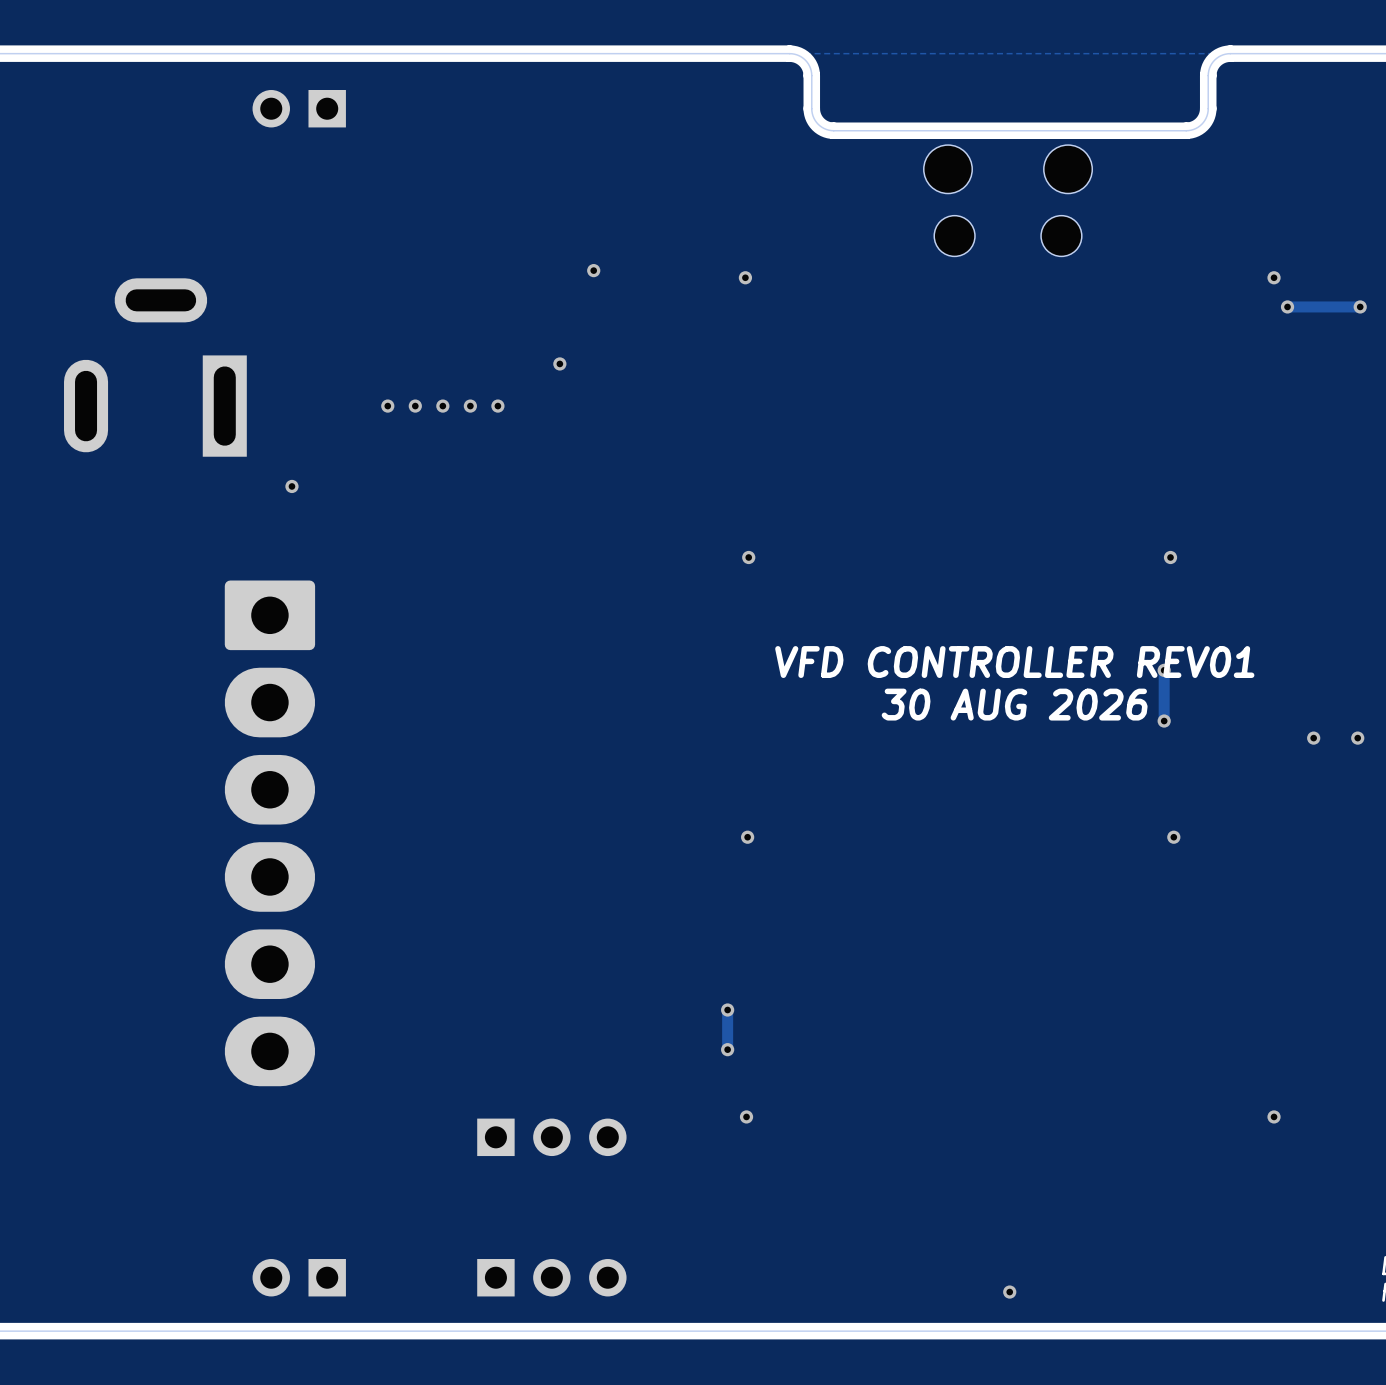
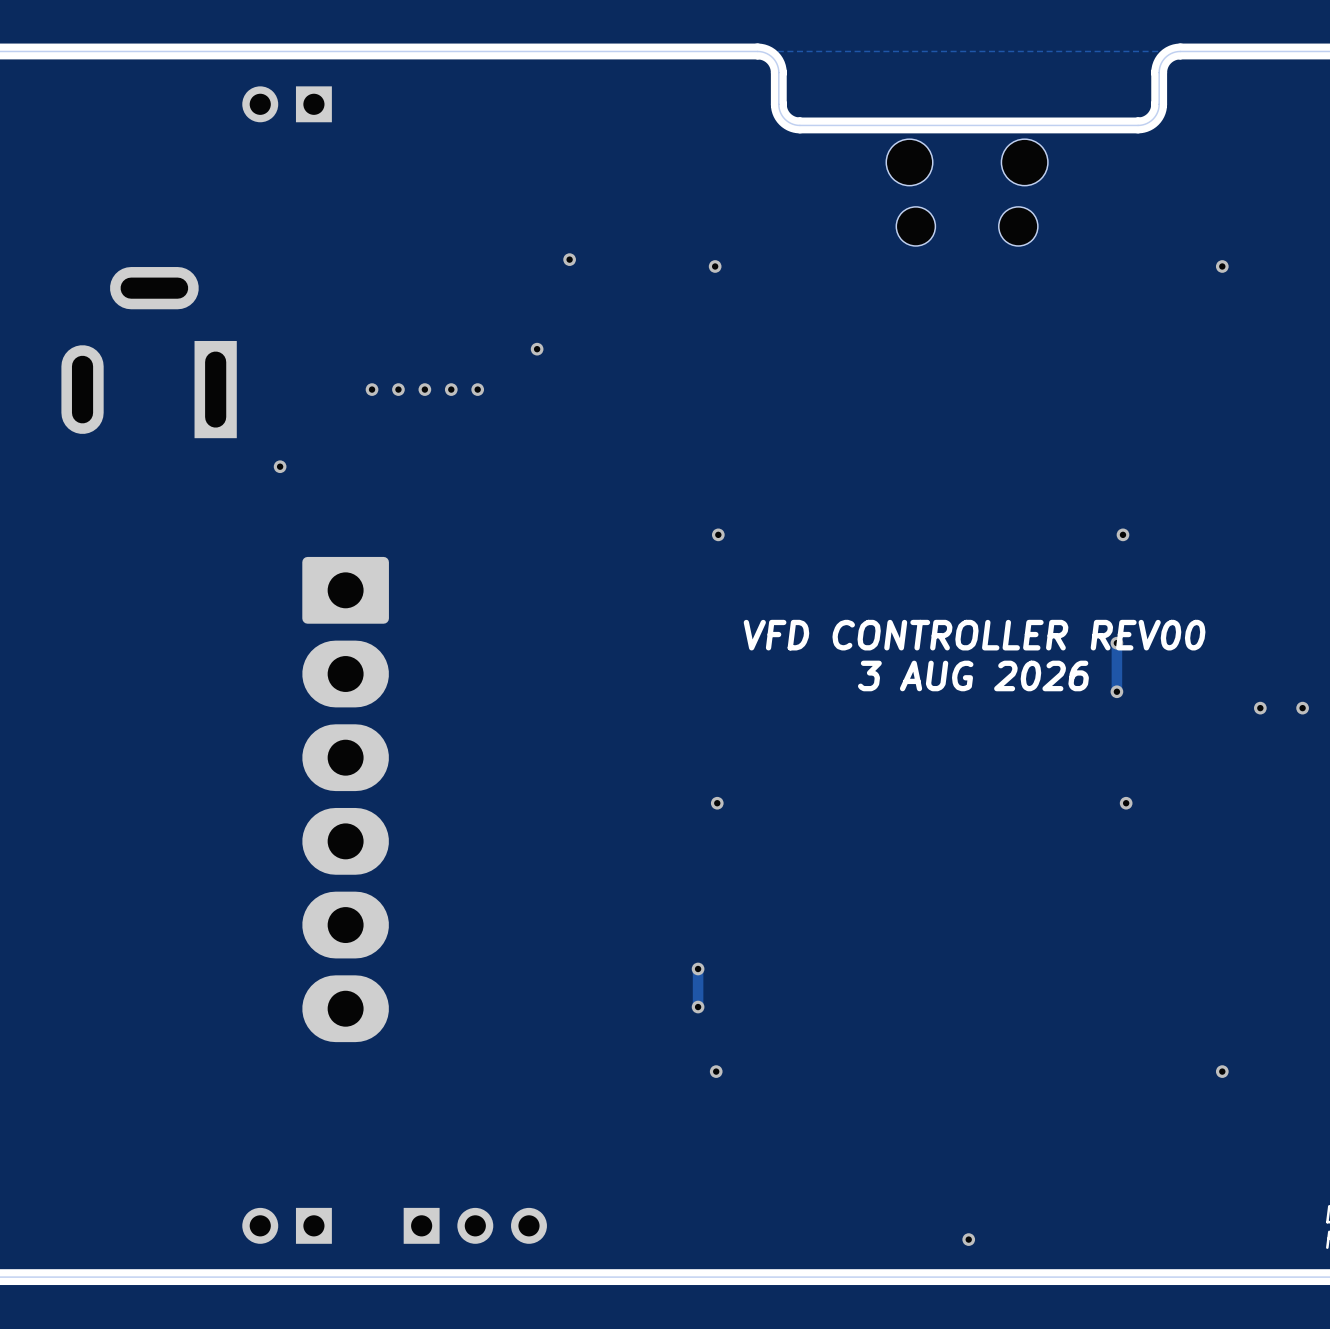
via: (1287, 306) -> none
track: (1360, 306) (1287, 306) -> none
via: (1360, 306) -> none
text: VFD CONTROLLER REV01 (1014, 662) -> VFD CONTROLLER REV00 (974, 635)
text: 30 AUG 2026 (1014, 704) -> 3 AUG 2026 (973, 675)
part position: (269, 833) -> (345, 799)
part: (551, 1137) -> none
part position: (551, 1277) -> (475, 1225)

